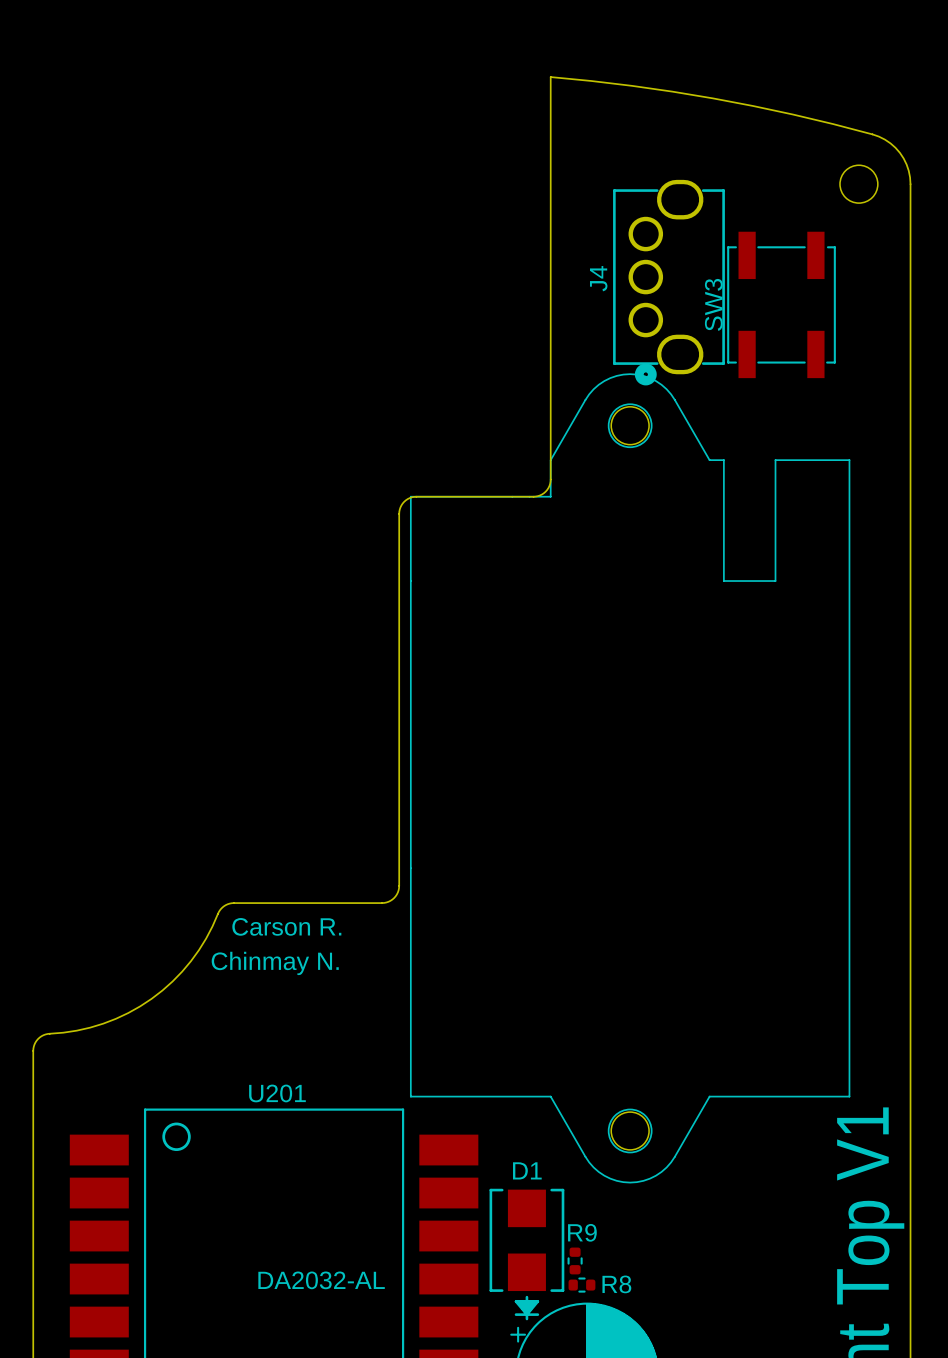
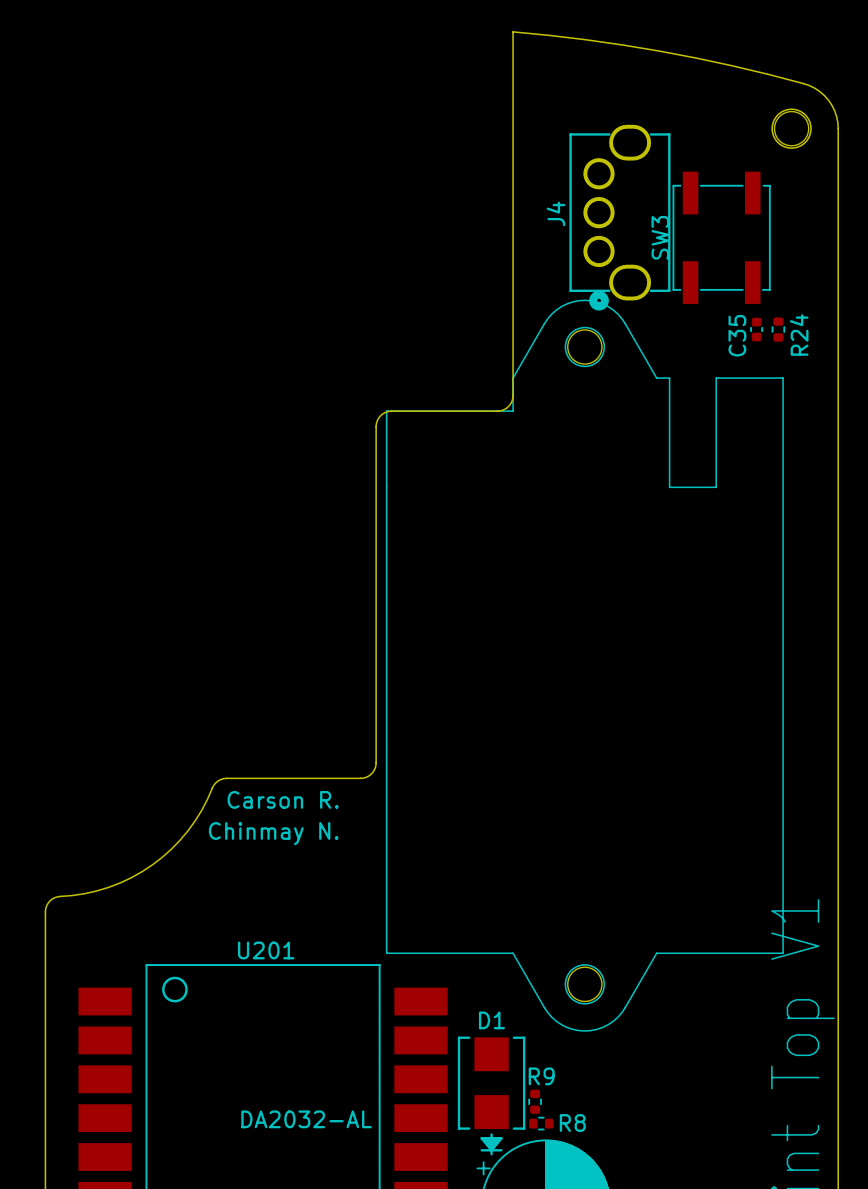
round board edge: none -> [771, 108, 812, 149]
C35: none -> (756, 329)
R24: none -> (778, 329)

